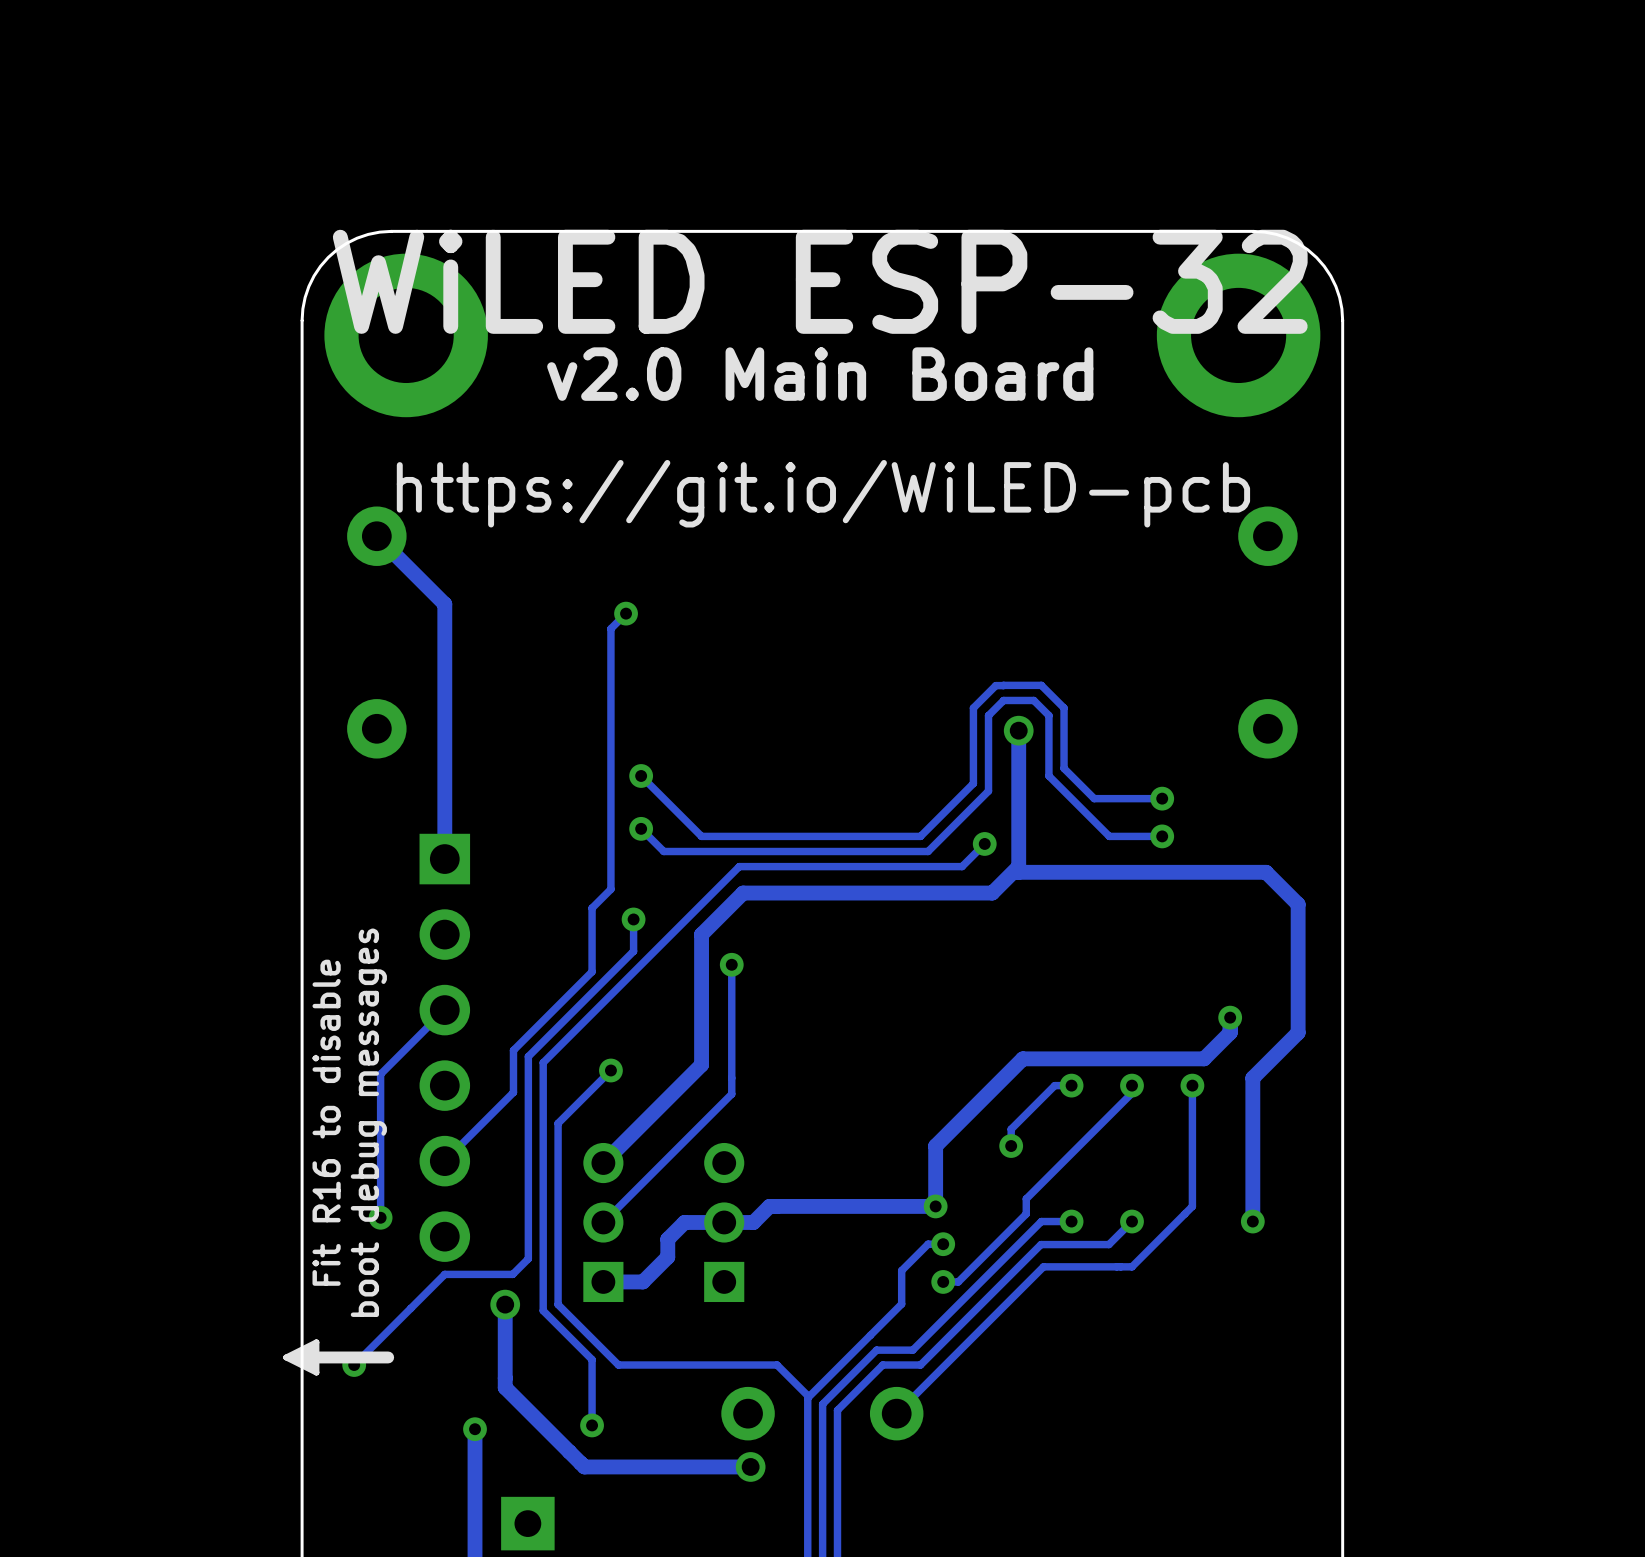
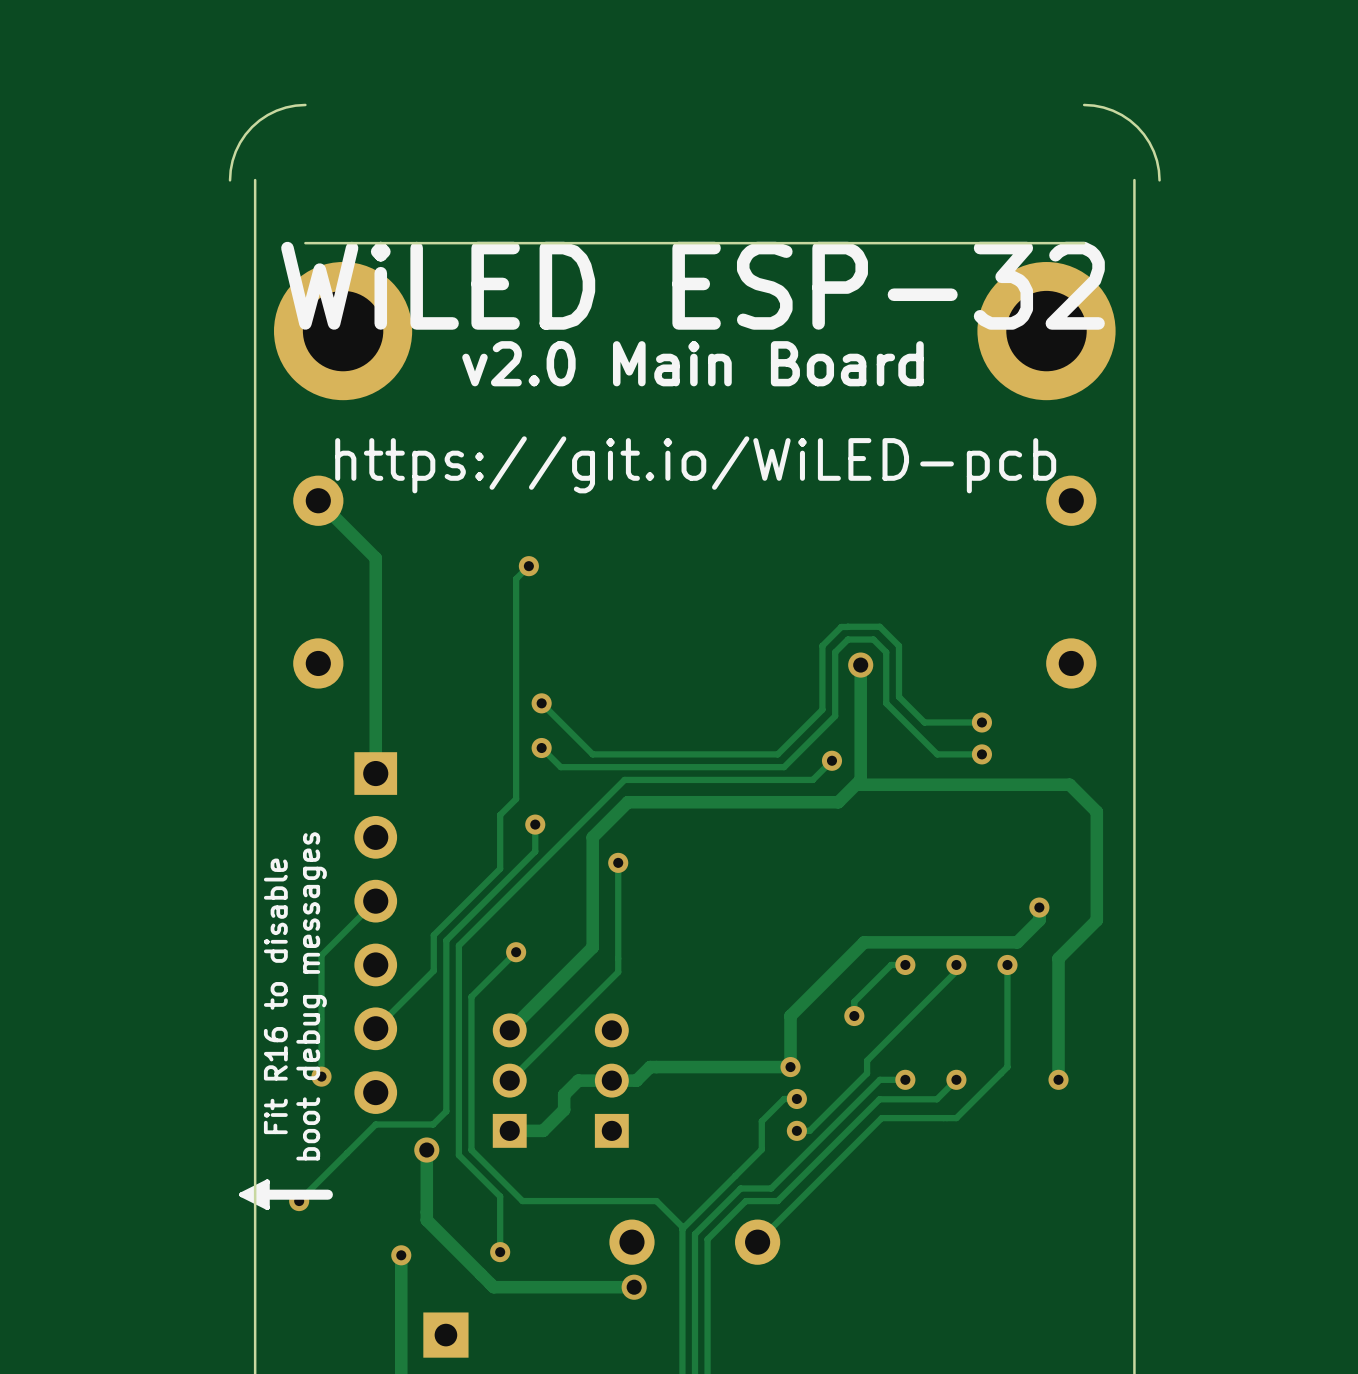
board edge: none -> (305, 104) (276, 110) (252, 127) (235, 151) (230, 180)
board edge: none -> (1084, 104) (1113, 110) (1137, 127) (1153, 151) (1159, 180)
board edge: none -> (255, 180) (255, 318)
board edge: none -> (1134, 180) (1134, 318)
board edge: (391, 231) (368, 234) (357, 238) (336, 249) (328, 257) (320, 266) (308, 286) (302, 308) (302, 320) -> (330, 243) (305, 243)
board edge: (1253, 231) (1276, 234) (1287, 238) (1307, 249) (1316, 257) (1324, 266) (1335, 286) (1341, 308) (1342, 320) -> (1059, 243) (1084, 243)

